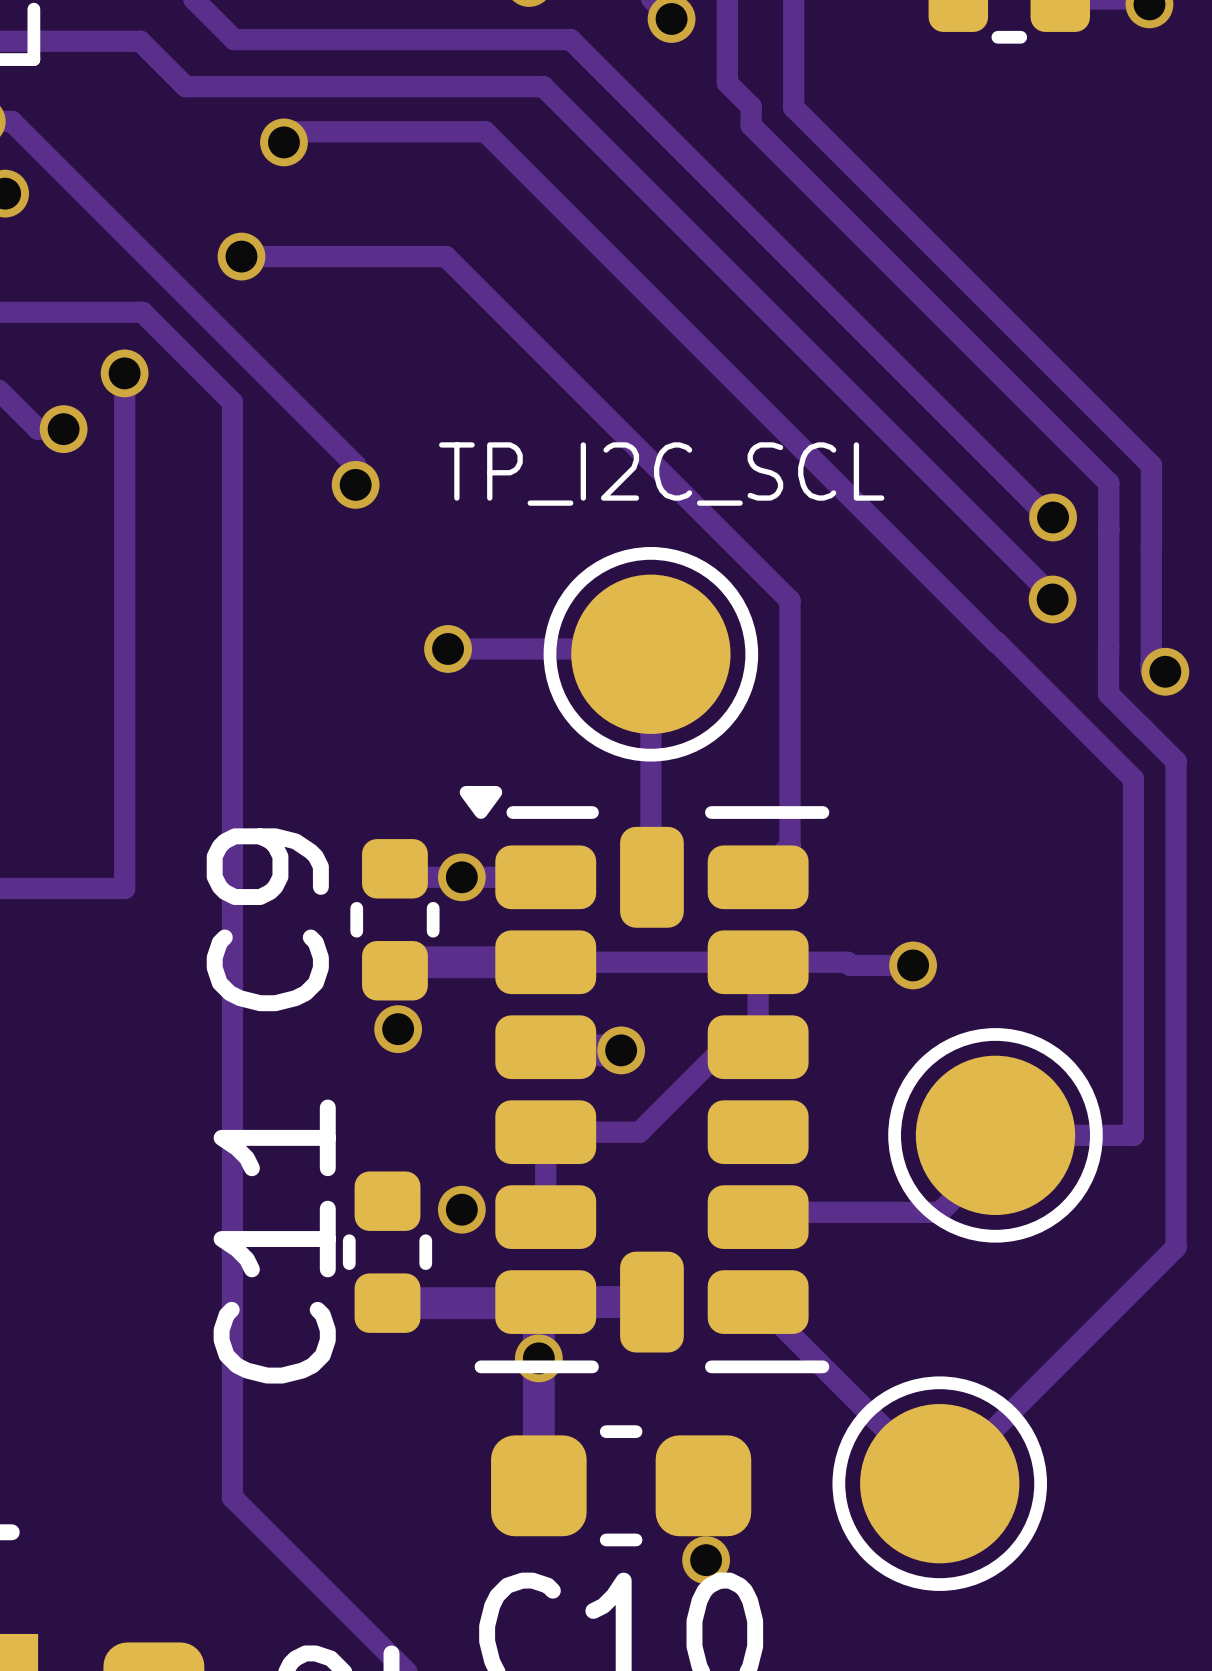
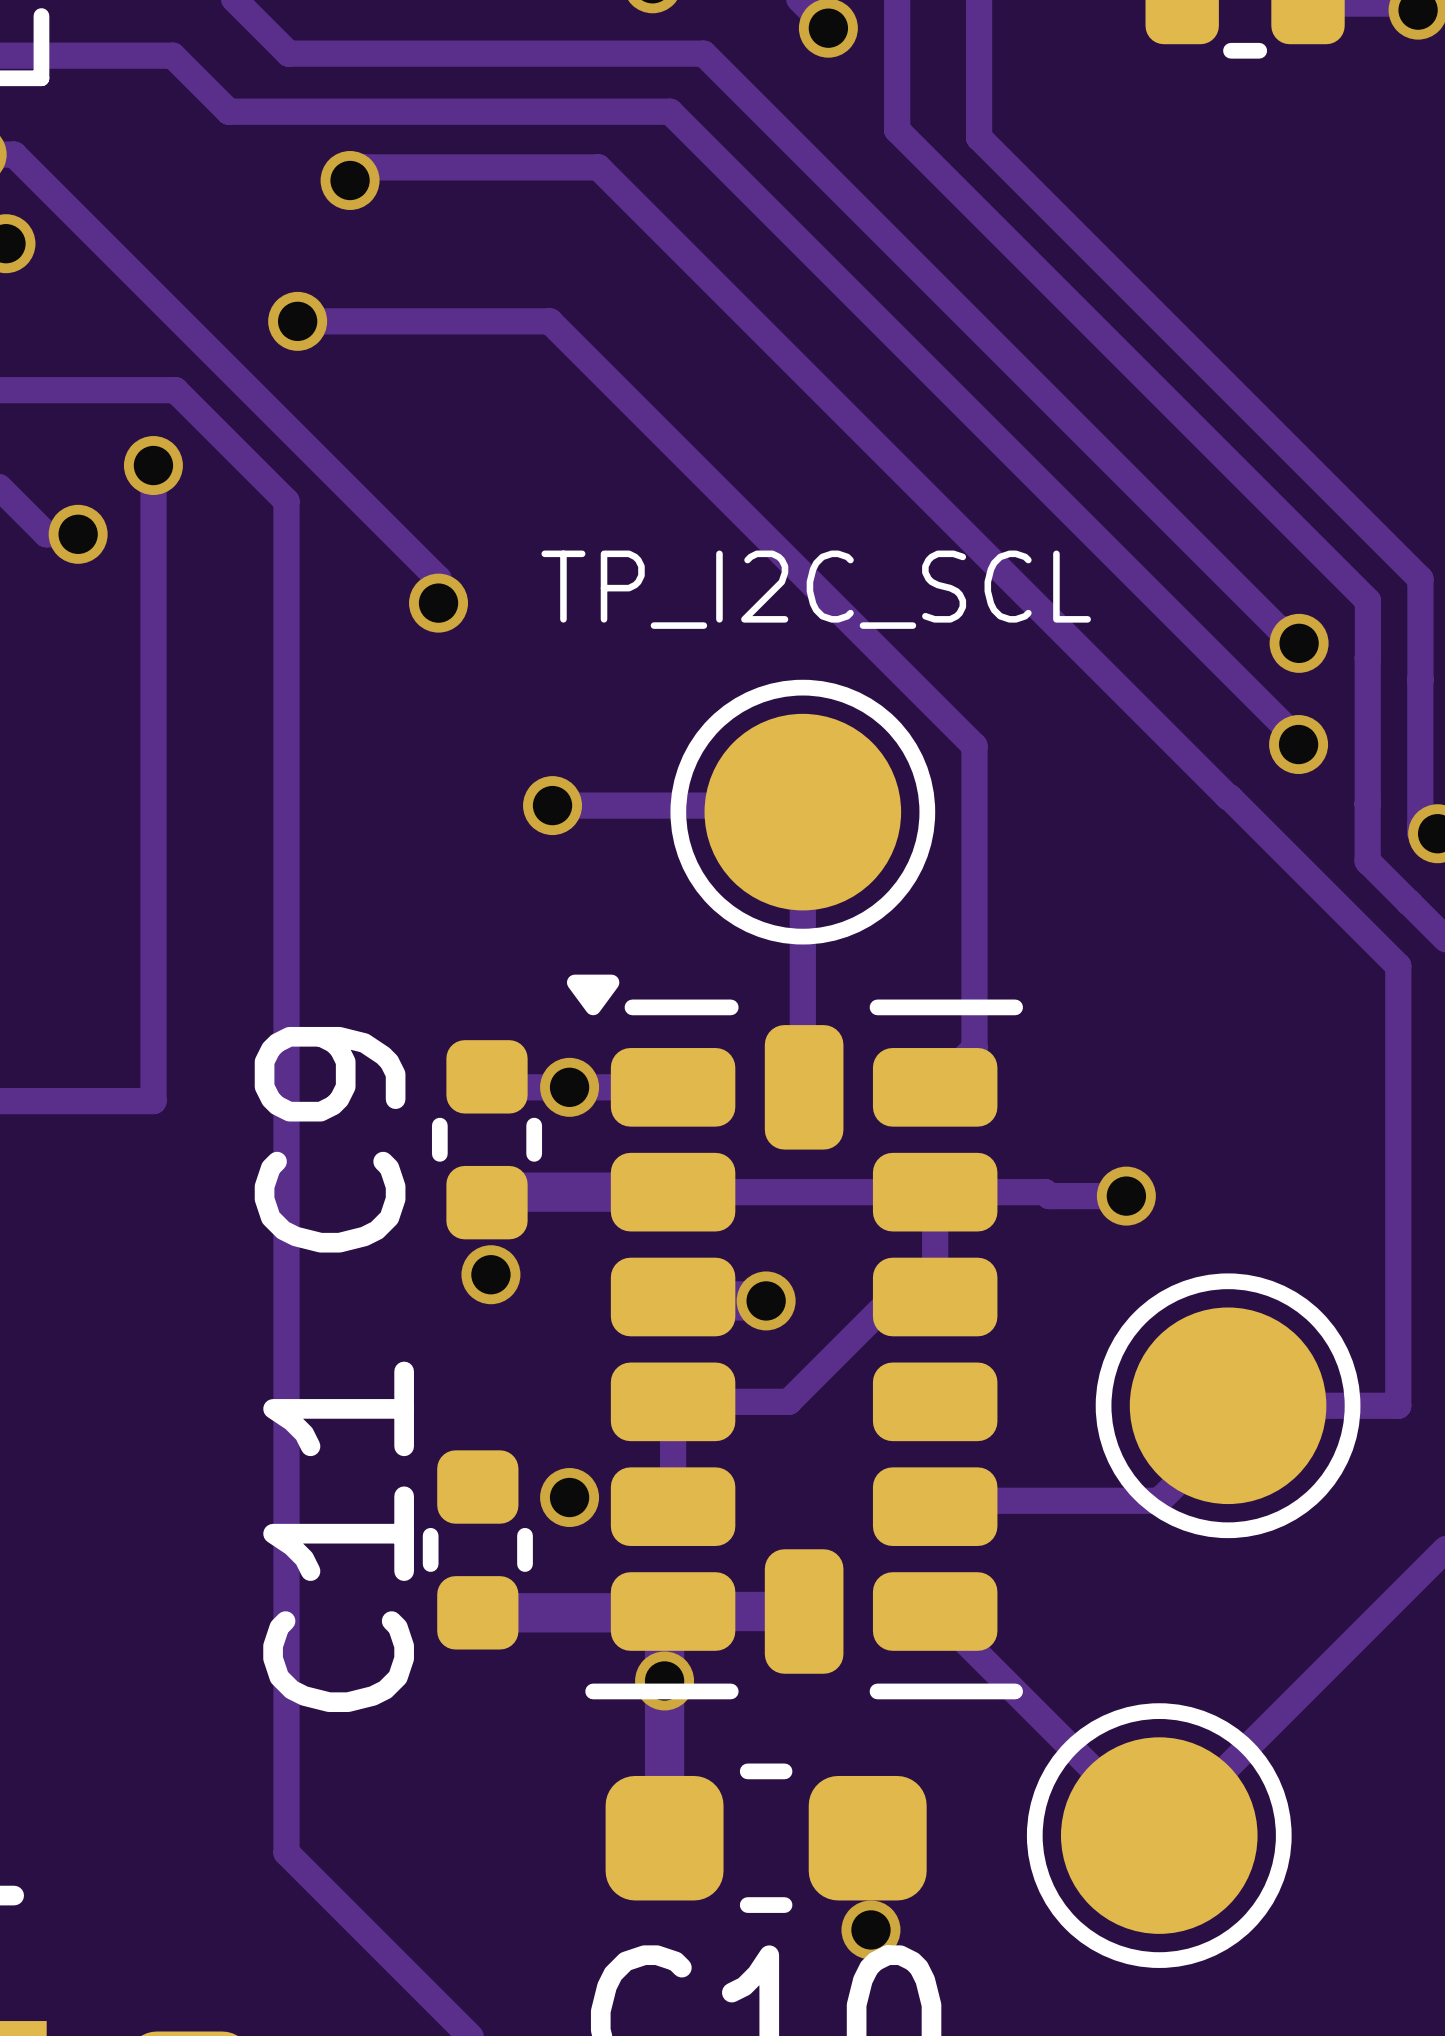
track: (727, 82) (751, 106) (751, 125) -> (897, 107) (897, 130) (926, 159)

